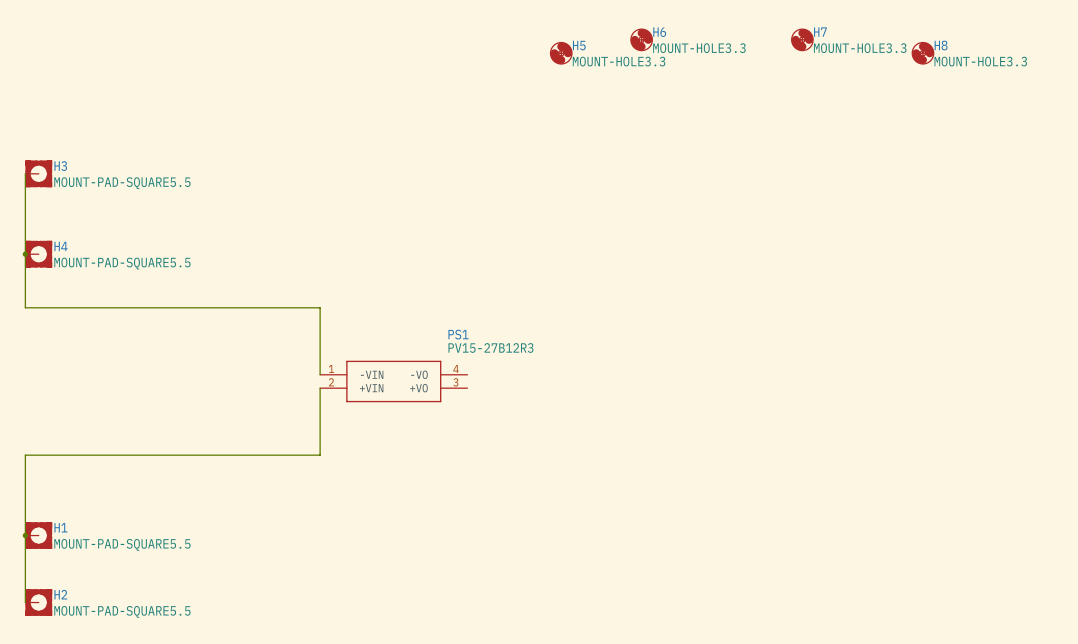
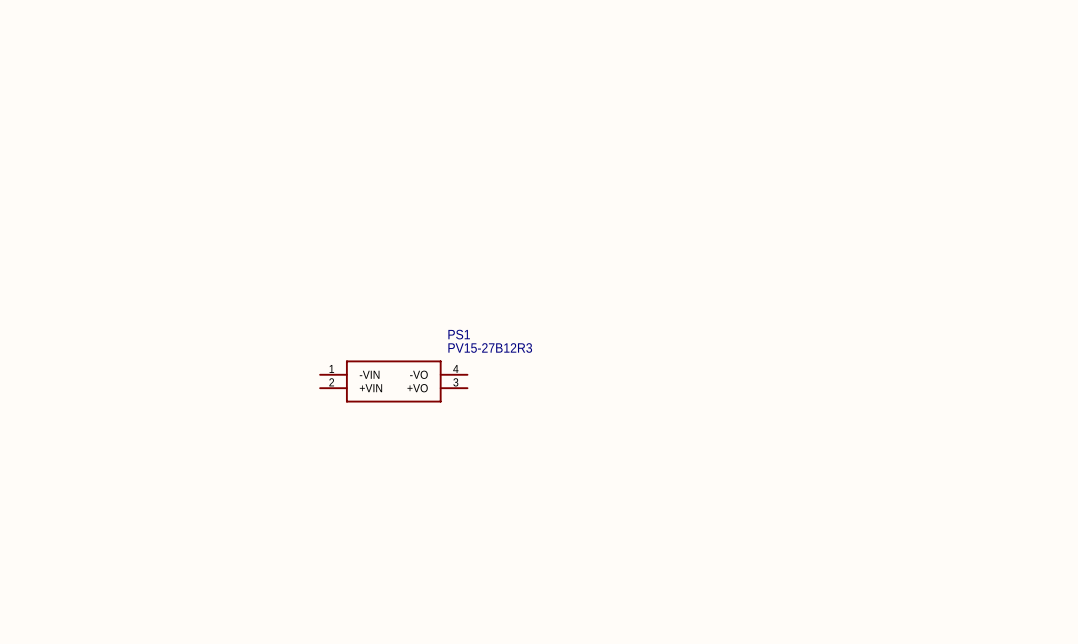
H6: MOUNT-HOLE3.3 (641, 39) -> none
H7: MOUNT-HOLE3.3 (802, 39) -> none
H5: MOUNT-HOLE3.3 (561, 53) -> none
H8: MOUNT-HOLE3.3 (922, 53) -> none
wire: (25, 173) (25, 307) (320, 307) (320, 374) -> none
H3: MOUNT-PAD-SQUARE5.5 (38, 173) -> none
junction: (25, 254) -> none
H4: MOUNT-PAD-SQUARE5.5 (38, 254) -> none
wire: (320, 388) (320, 455) (25, 455) (25, 602) -> none
junction: (25, 535) -> none
H1: MOUNT-PAD-SQUARE5.5 (38, 535) -> none
H2: MOUNT-PAD-SQUARE5.5 (38, 602) -> none

